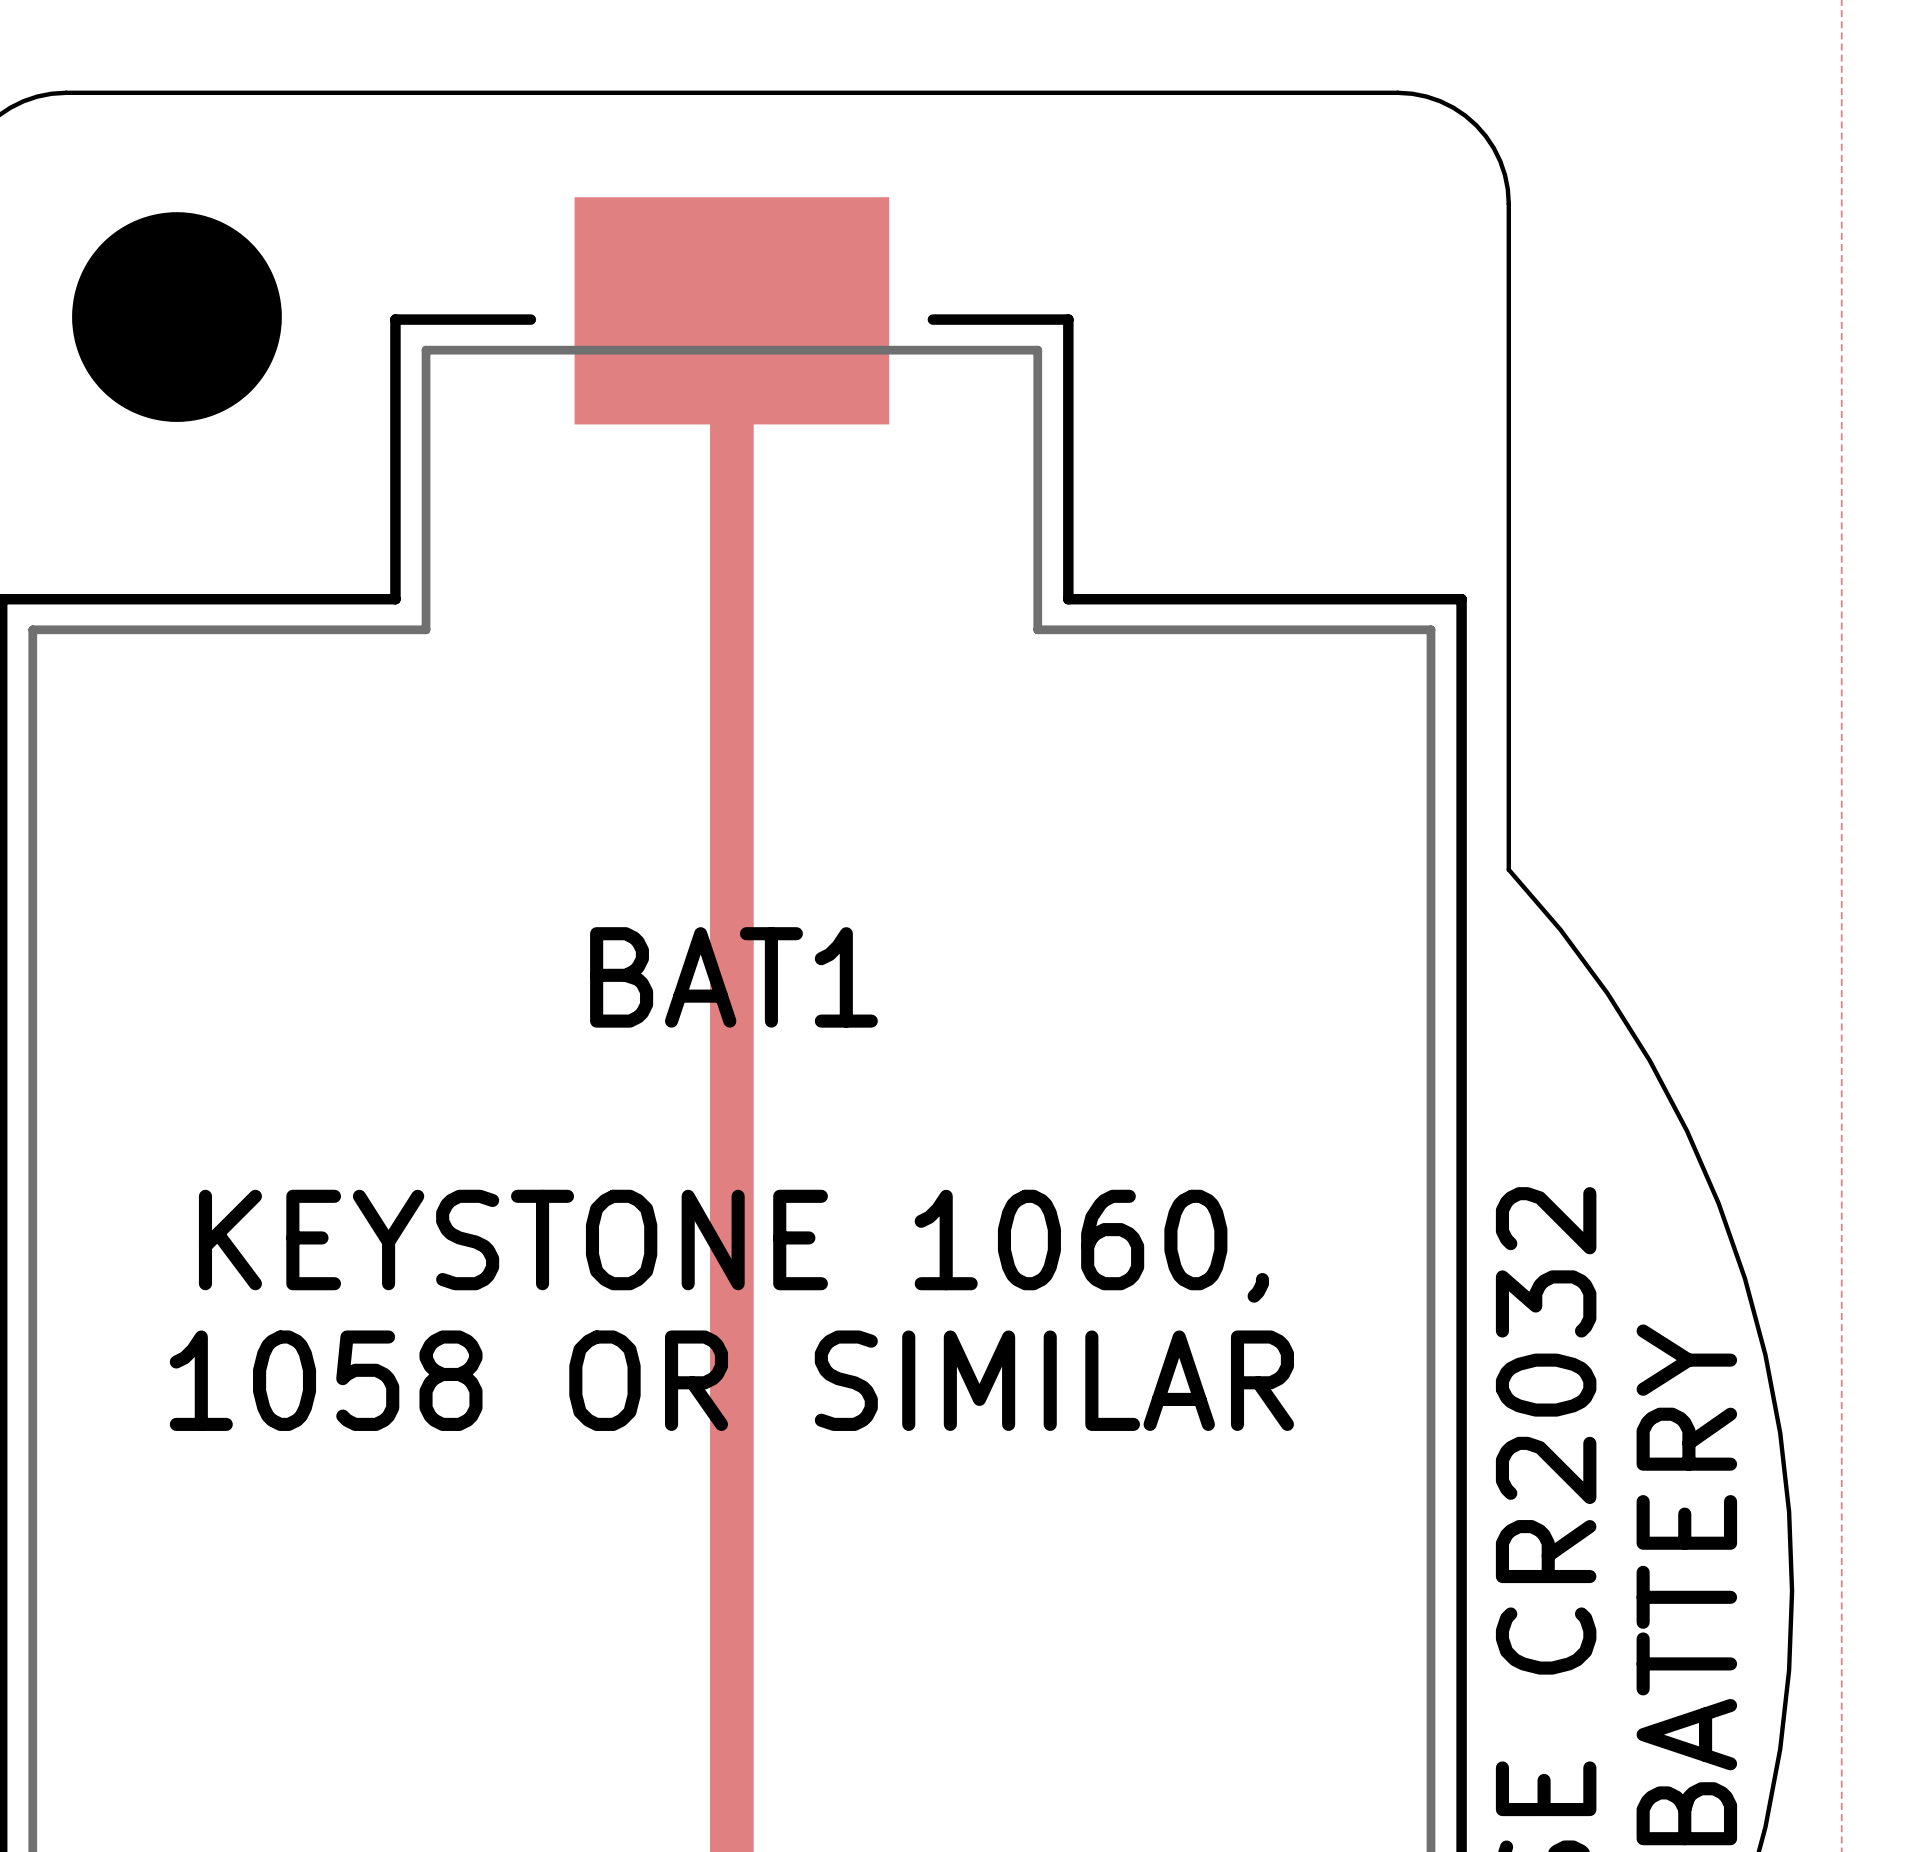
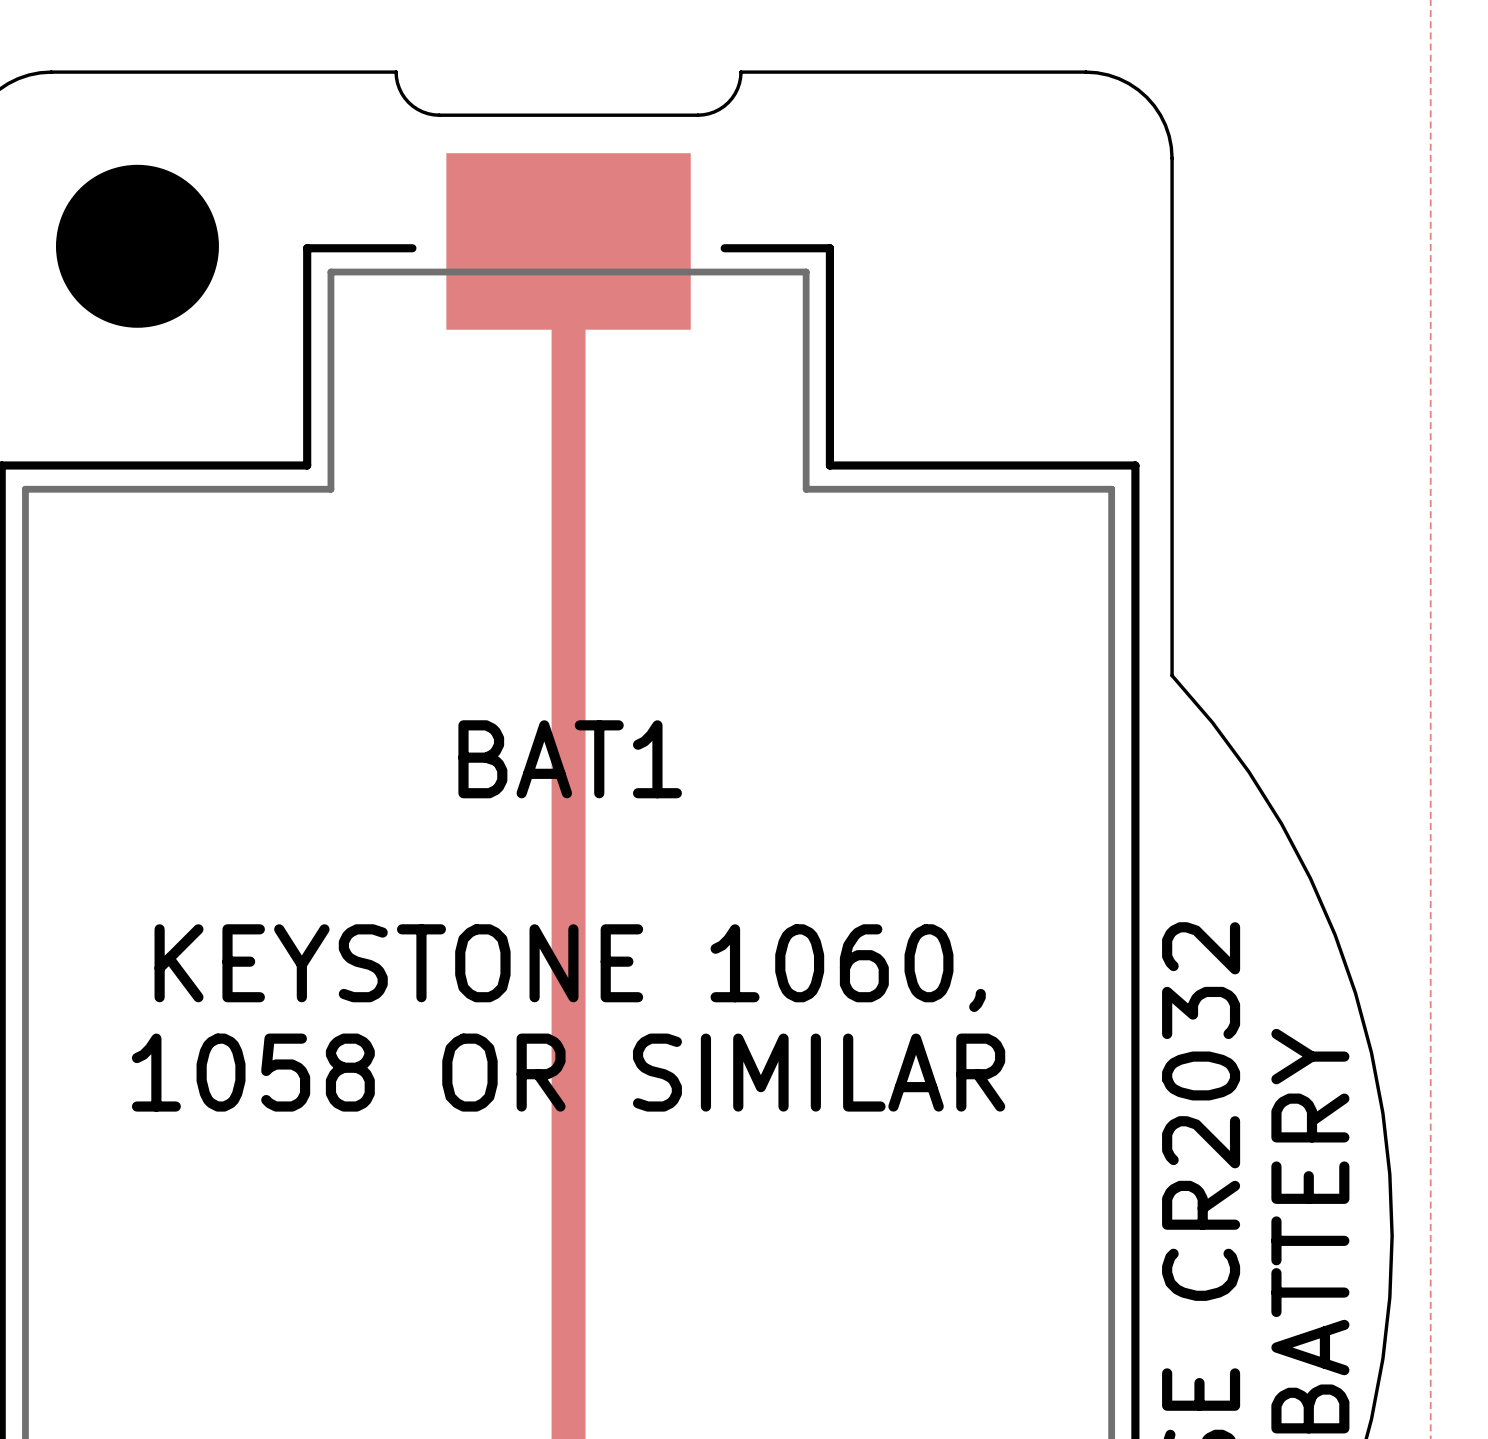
board edge: (509, 92) (953, 92) -> (396, 72) (399, 88) (408, 102) (422, 111) (439, 115) (703, 114) (714, 111) (728, 102) (737, 88) (740, 72)

